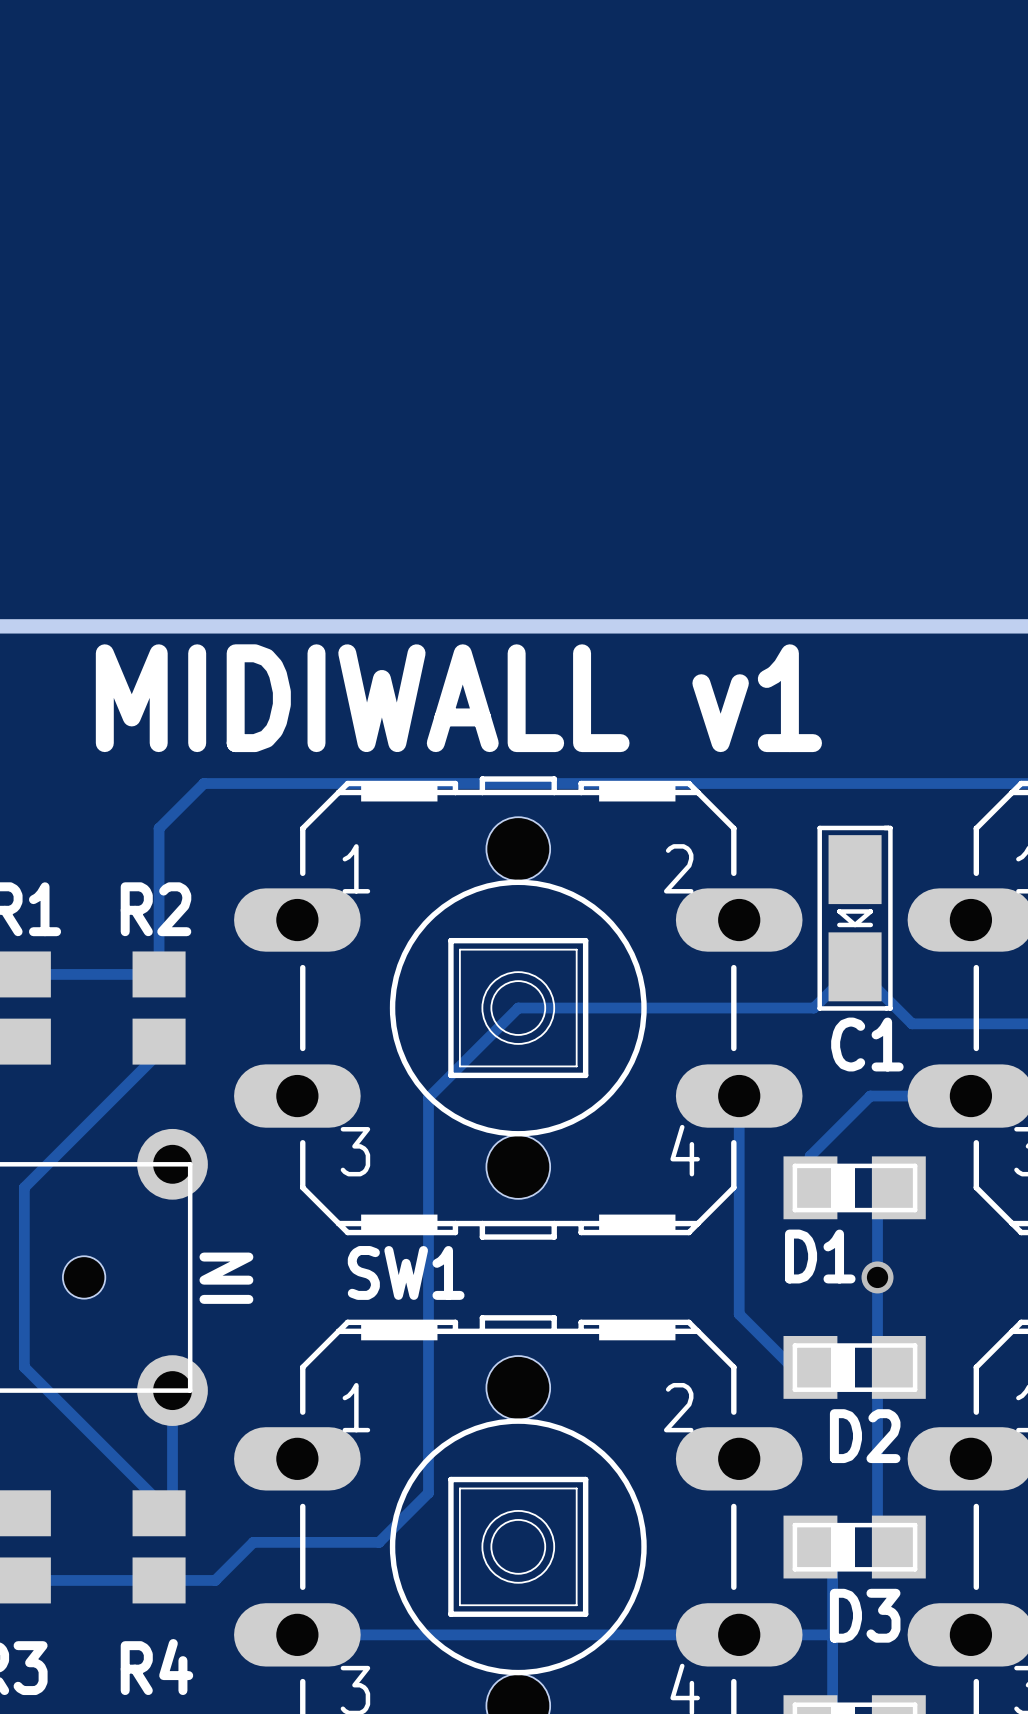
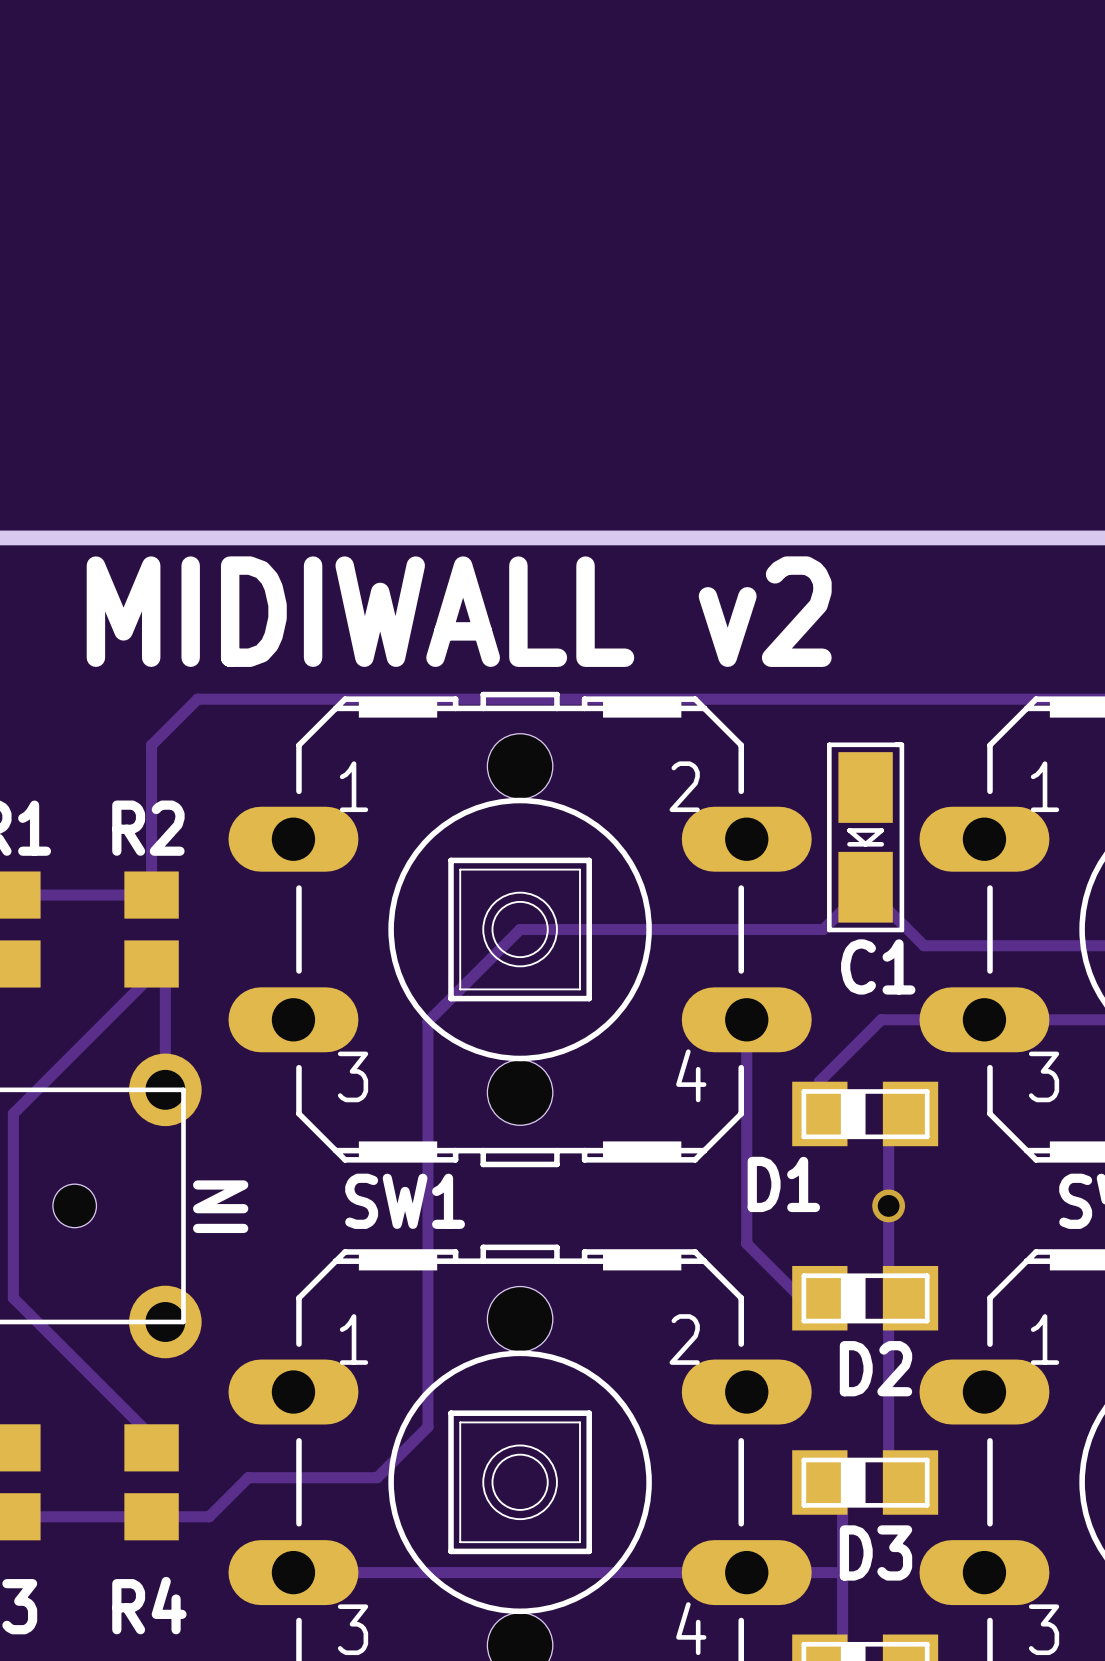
text: MIDIWALL v1 (458, 698) -> MIDIWALL v2 (459, 611)
track: none -> (151, 963) (165, 977) (165, 1091)
D1 name position: D1 (820, 1256) -> D1 (783, 1184)
track: (172, 1390) (172, 1499) -> none

